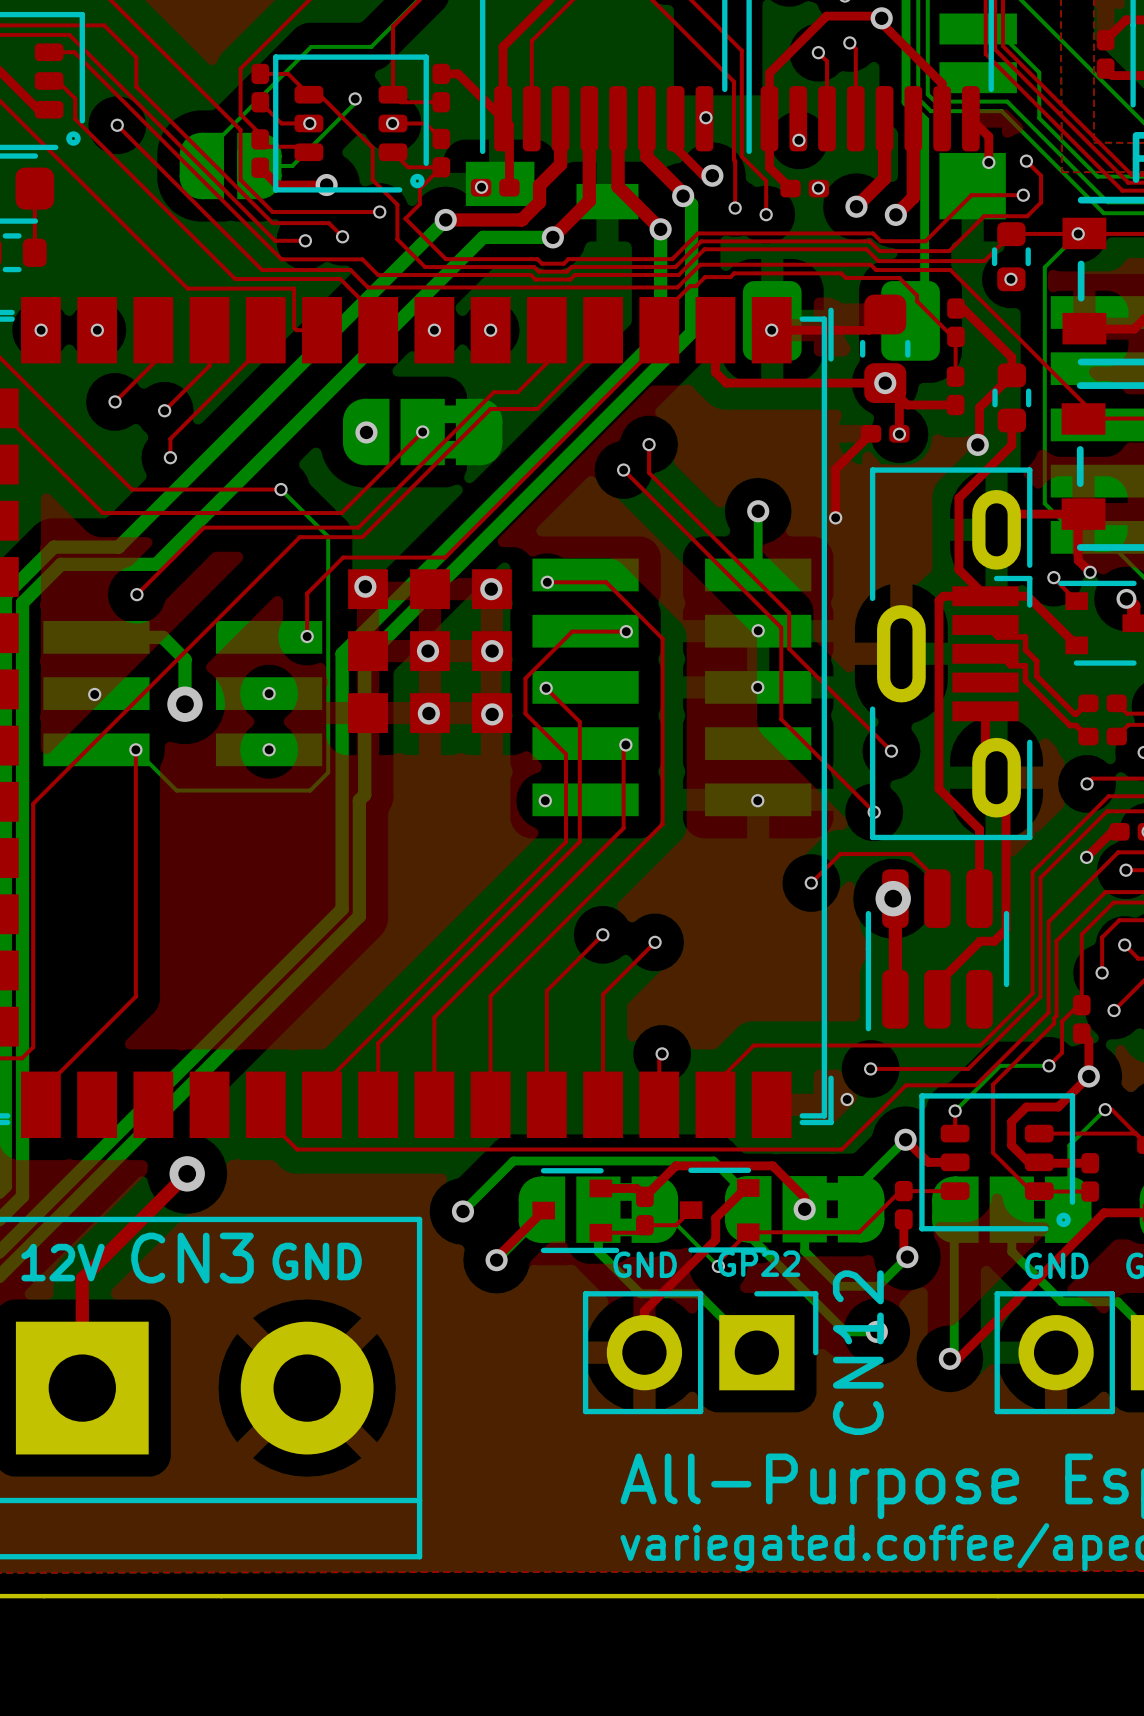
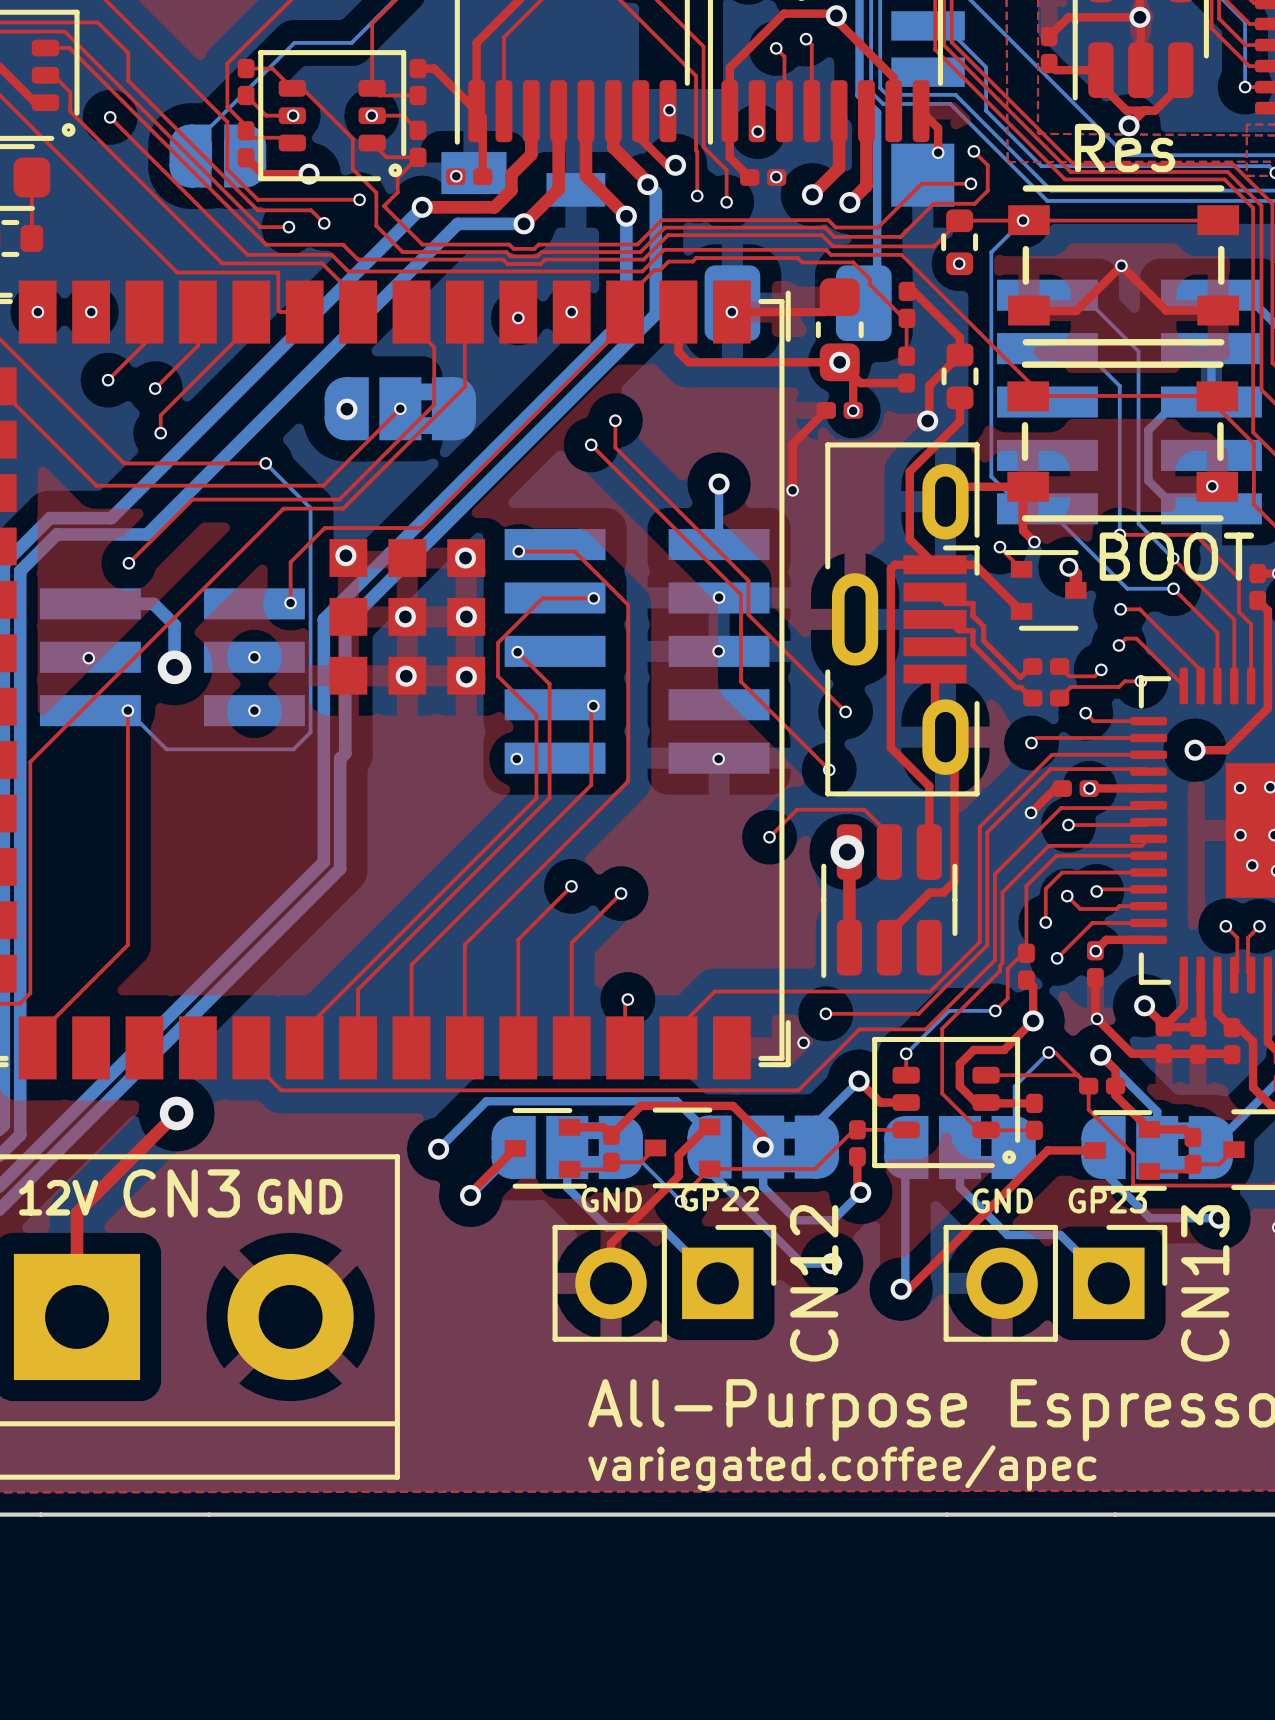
bottom track: (355, 98) (355, 103) (292, 165) (259, 165) -> none
via: (355, 98) -> none
via: (434, 330) -> none
via: (490, 330) -> none
top track: (546, 330) (546, 363) (517, 392) (493, 392) (458, 427) -> (411, 312) (411, 324) (434, 347) (434, 404)
top track: (603, 330) (603, 343) (537, 409) (490, 409) -> (464, 312) (464, 386)
via: none -> (571, 312)
via: none -> (518, 317)

